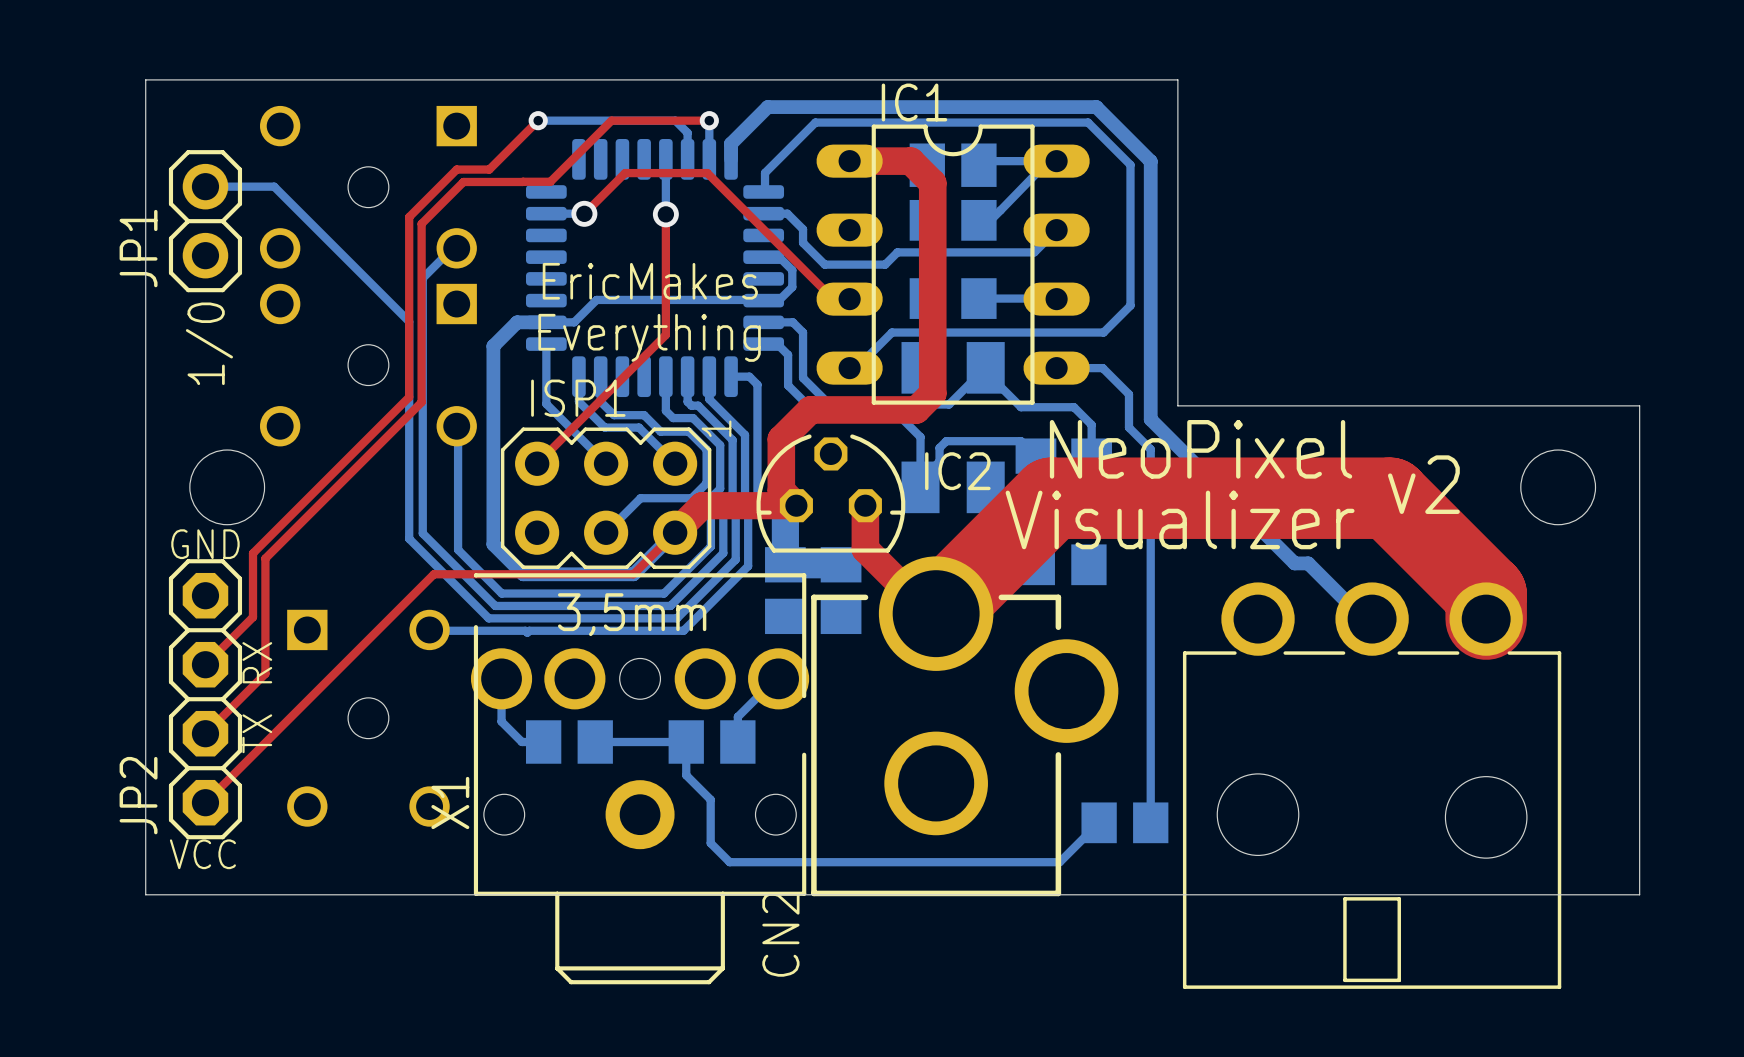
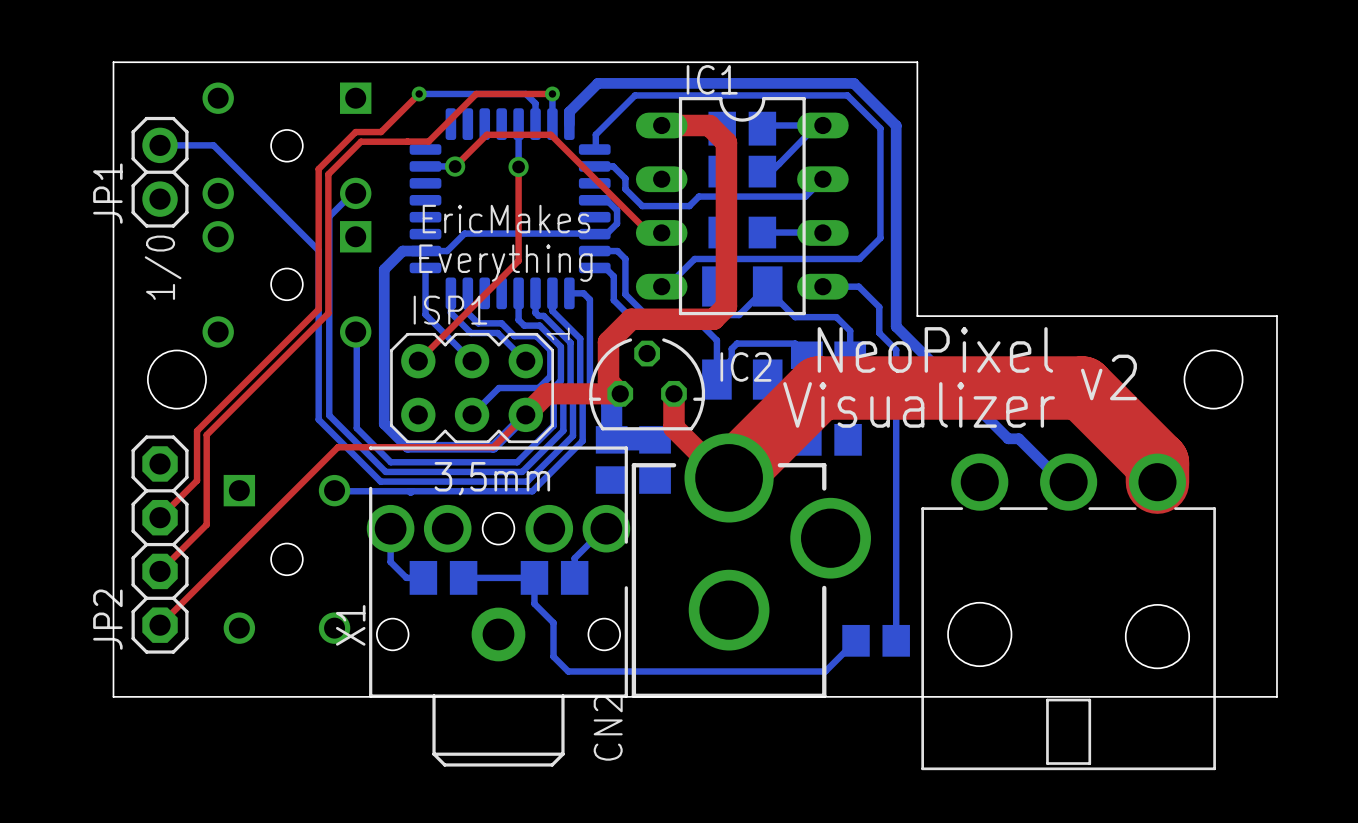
text: GND (205, 544) -> none
text: RX (257, 662) -> none
text: TX (257, 733) -> none
text: VCC (202, 854) -> none

